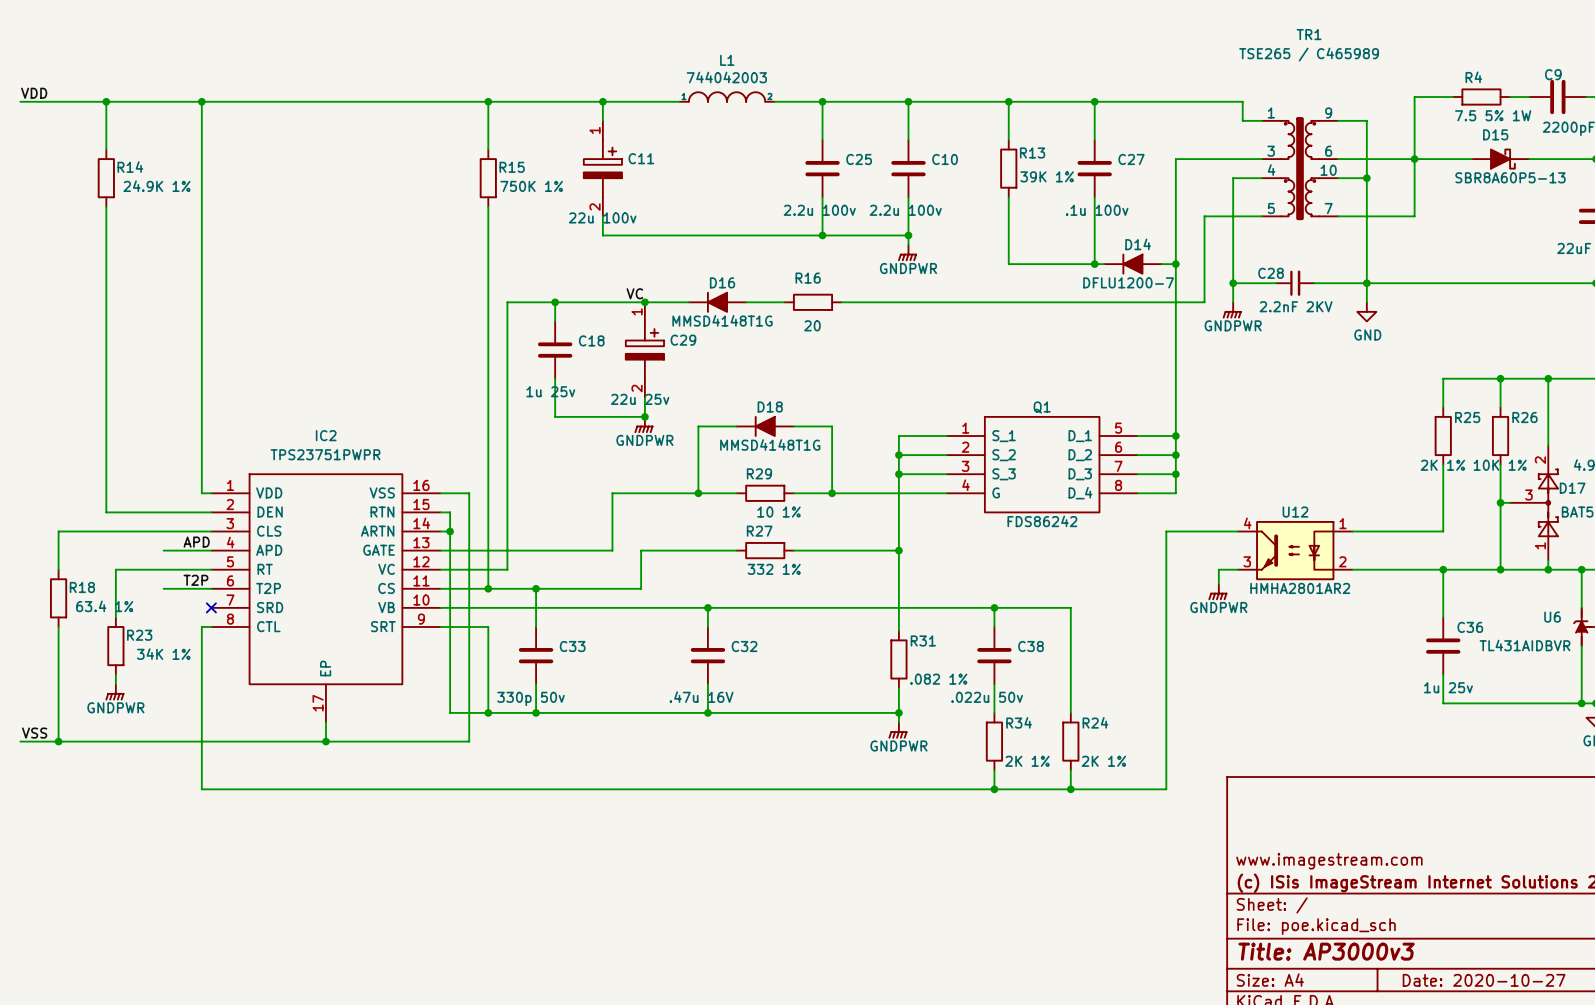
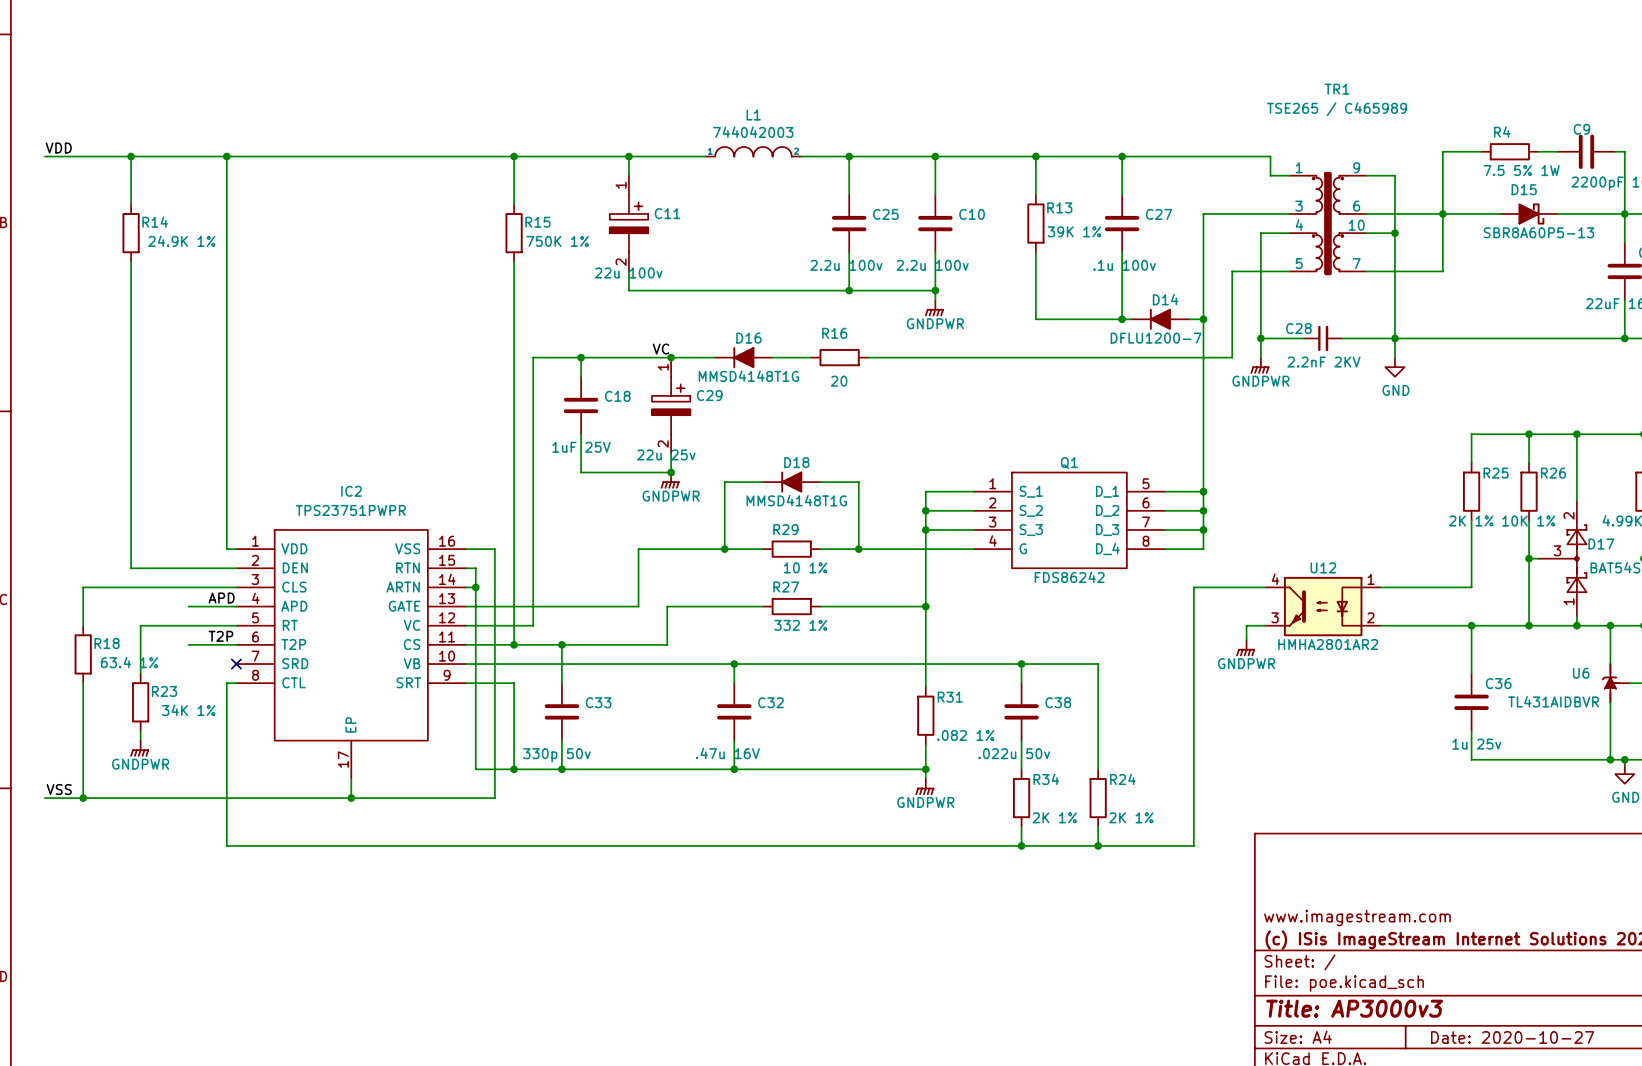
C18 value: 1u 25v (550, 391) -> 1uF 25V (581, 447)

